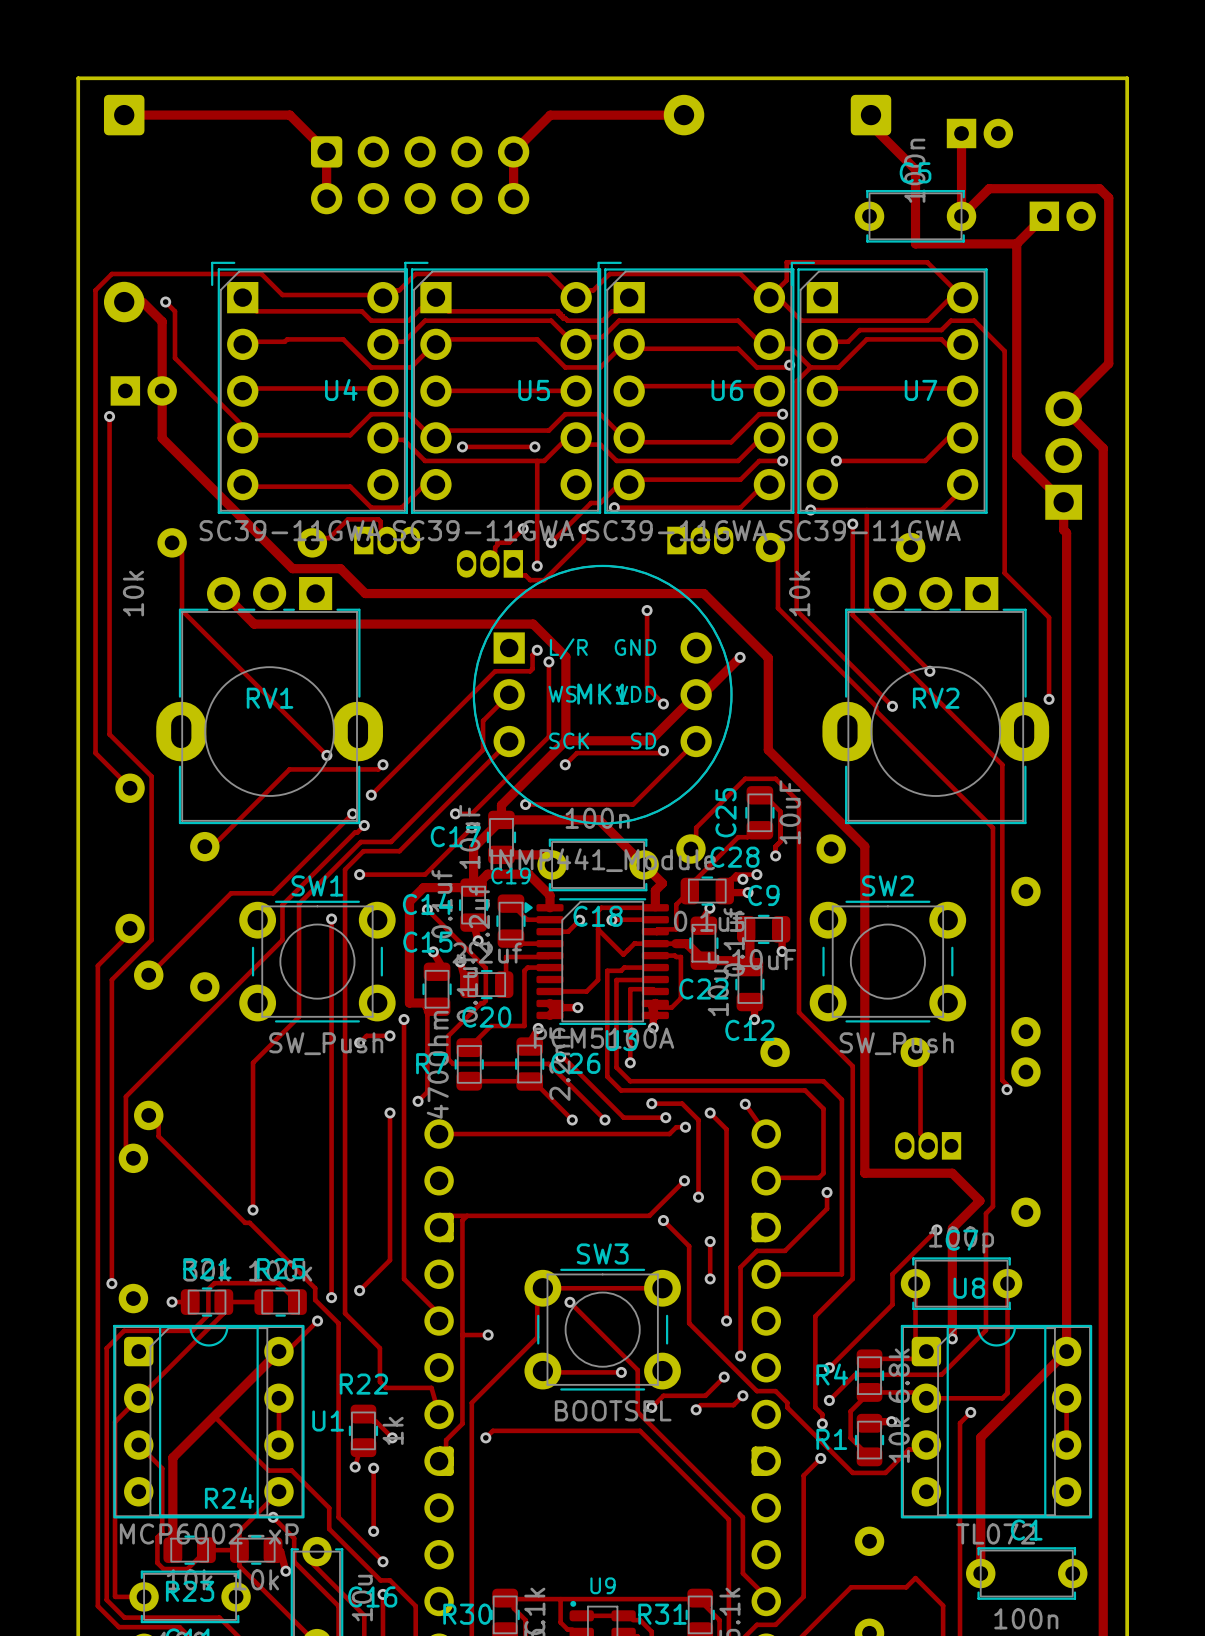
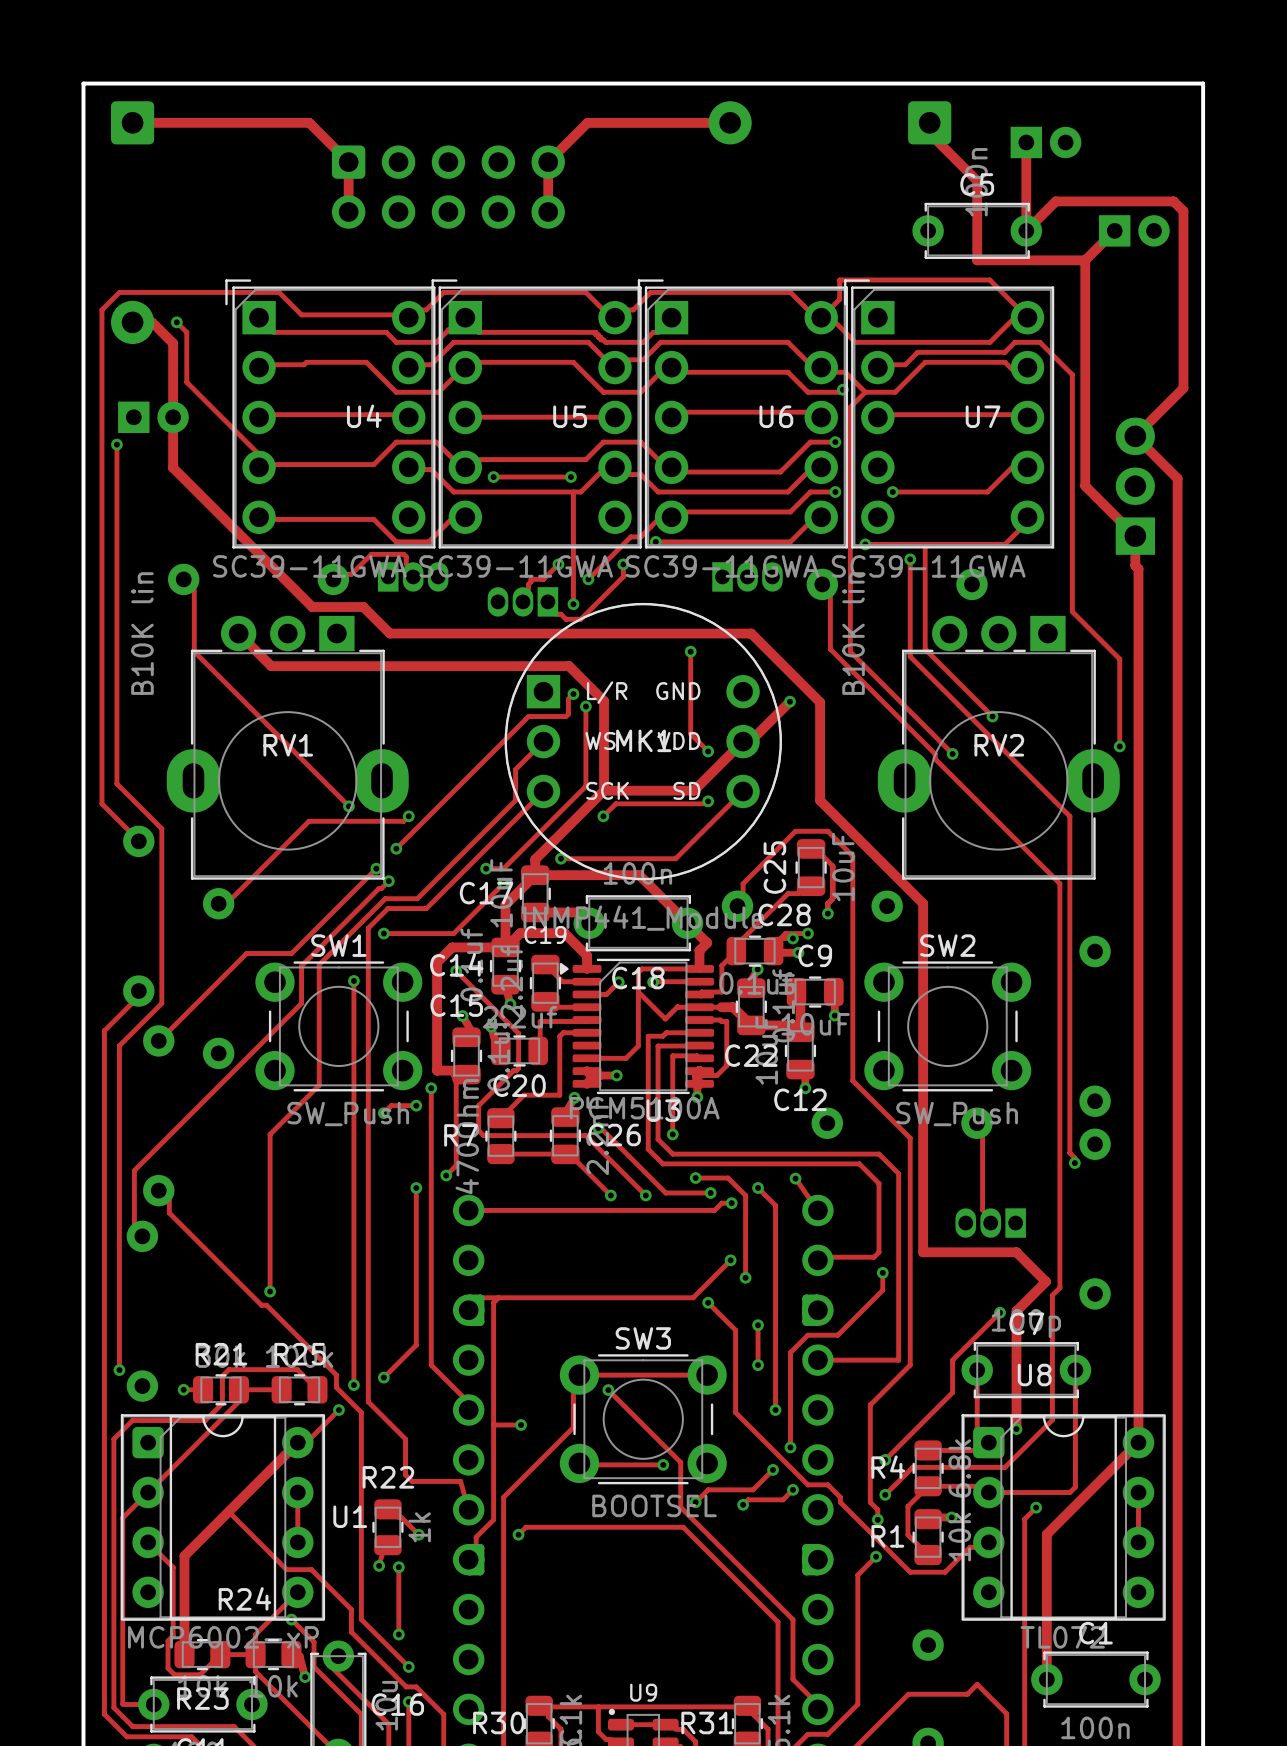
RV1 value: 10k (133, 593) -> B10K lin (142, 633)
RV2 value: 10k (799, 593) -> B10K lin (853, 633)

